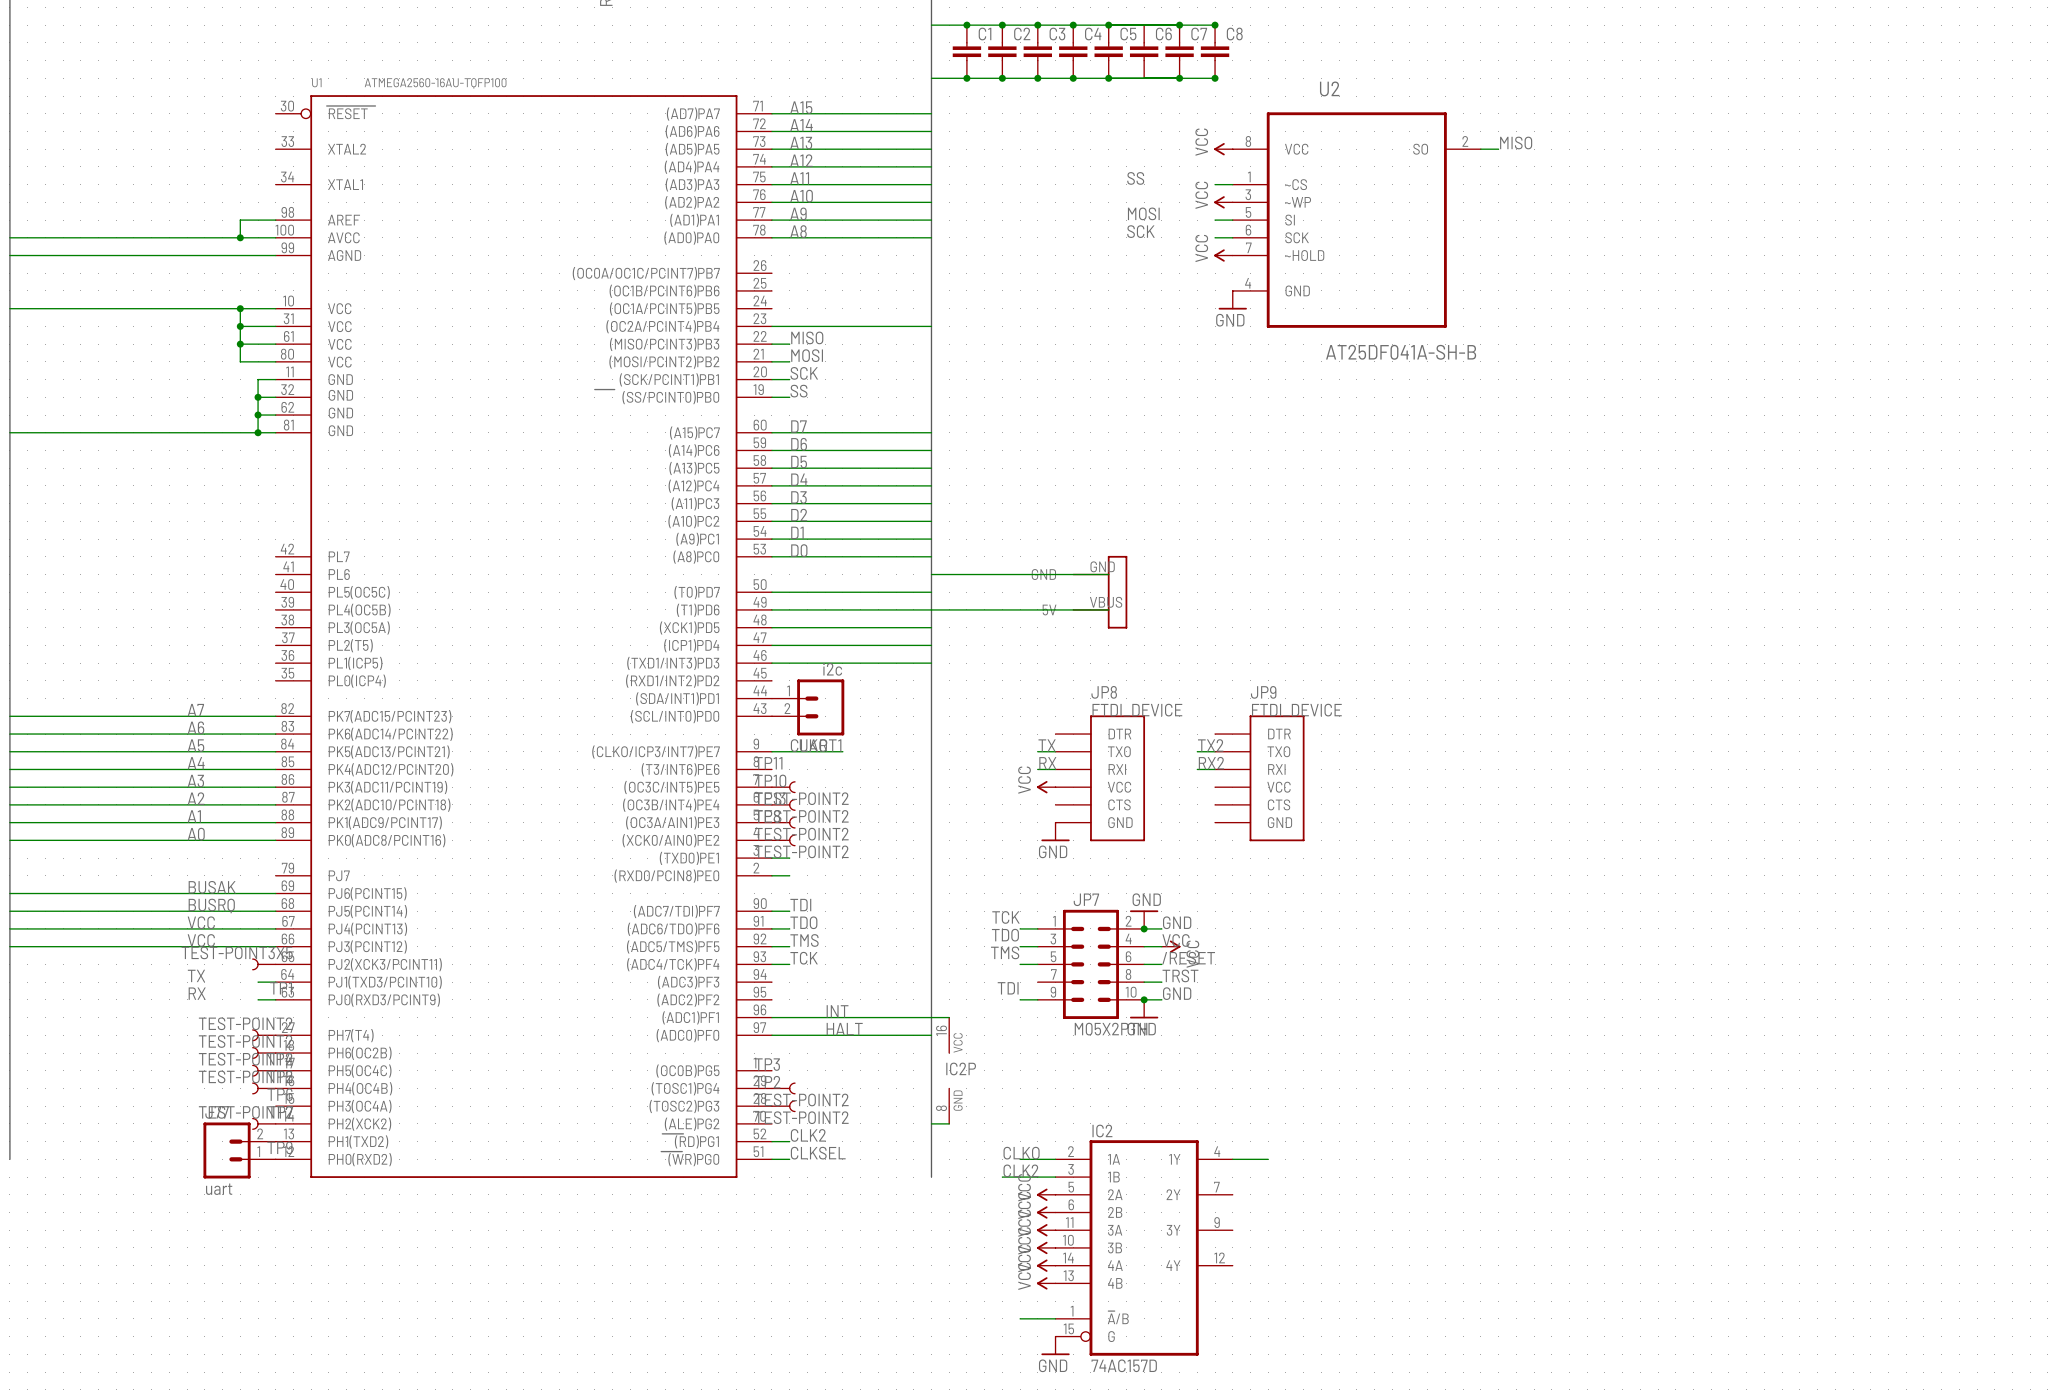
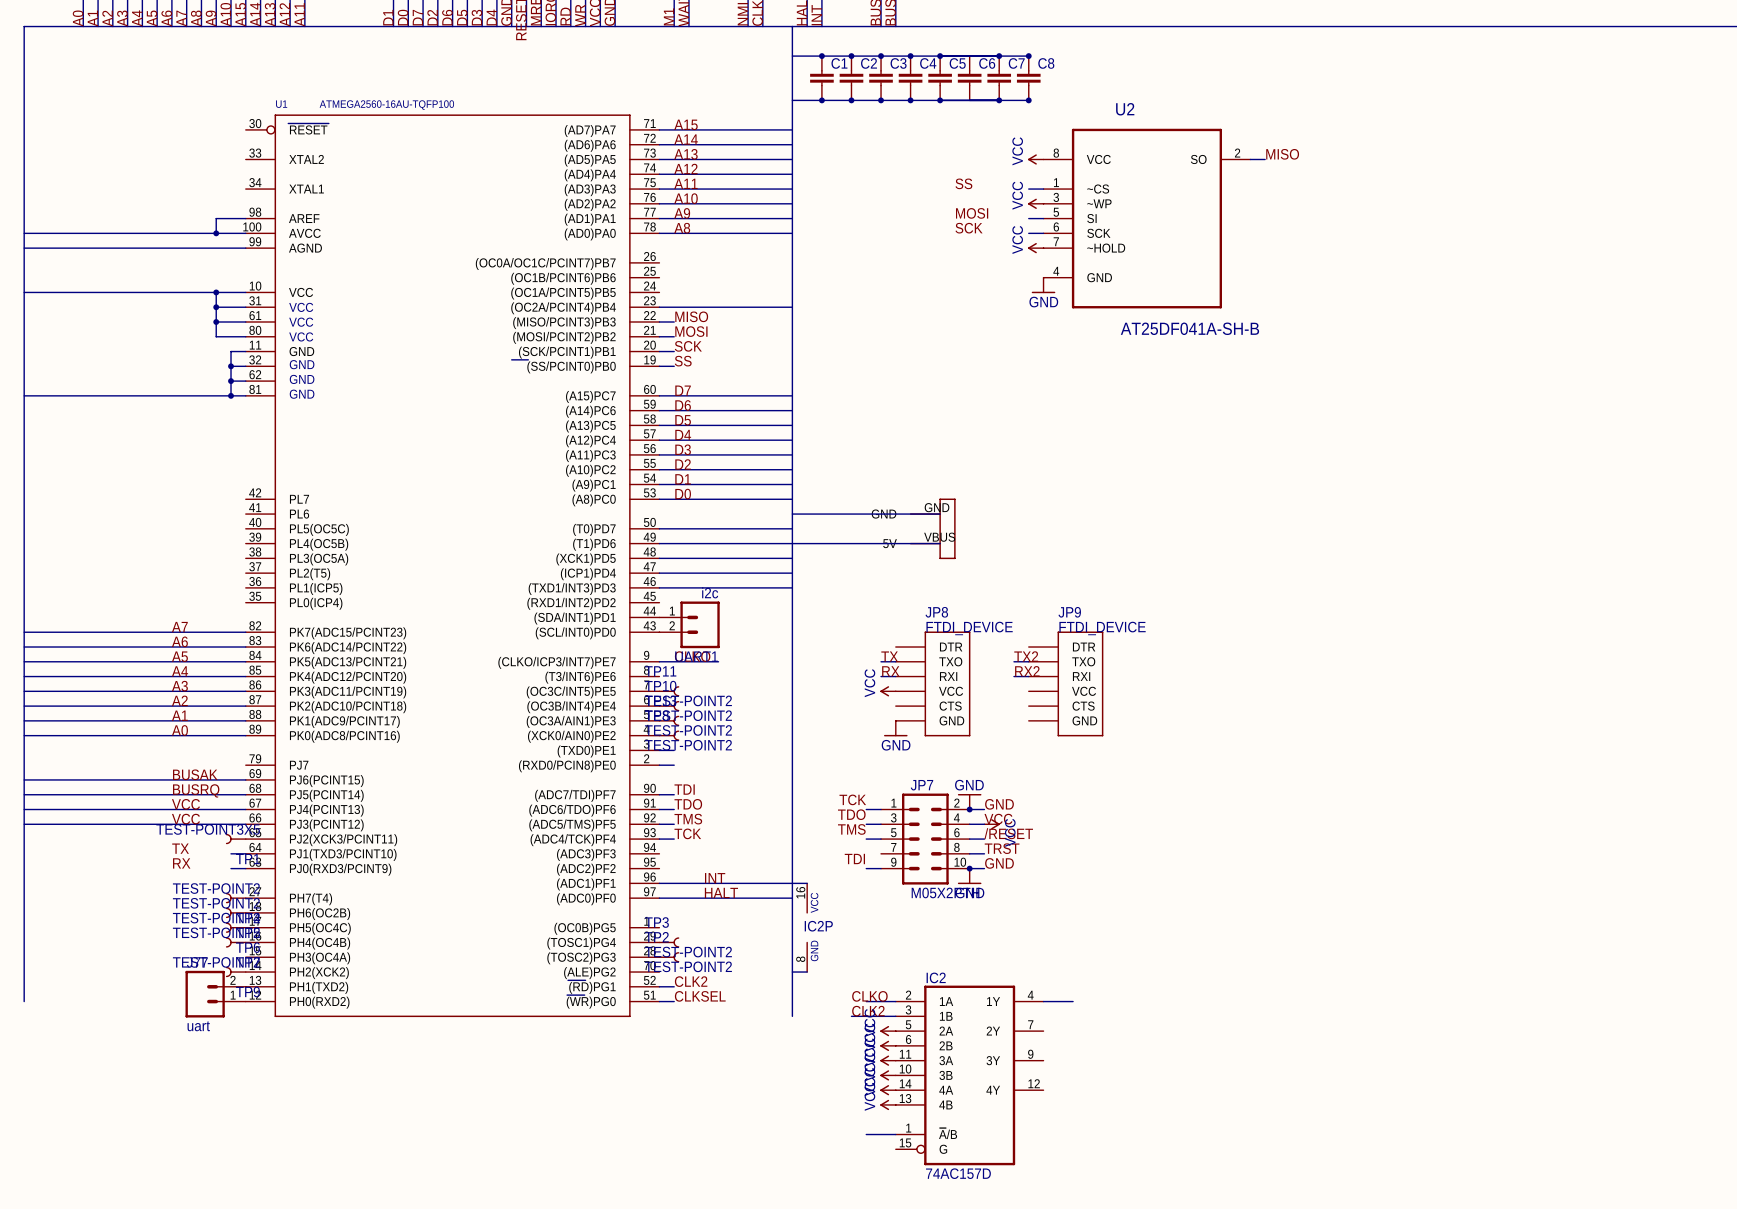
power symbol: GND (1055, 1345) -> none

